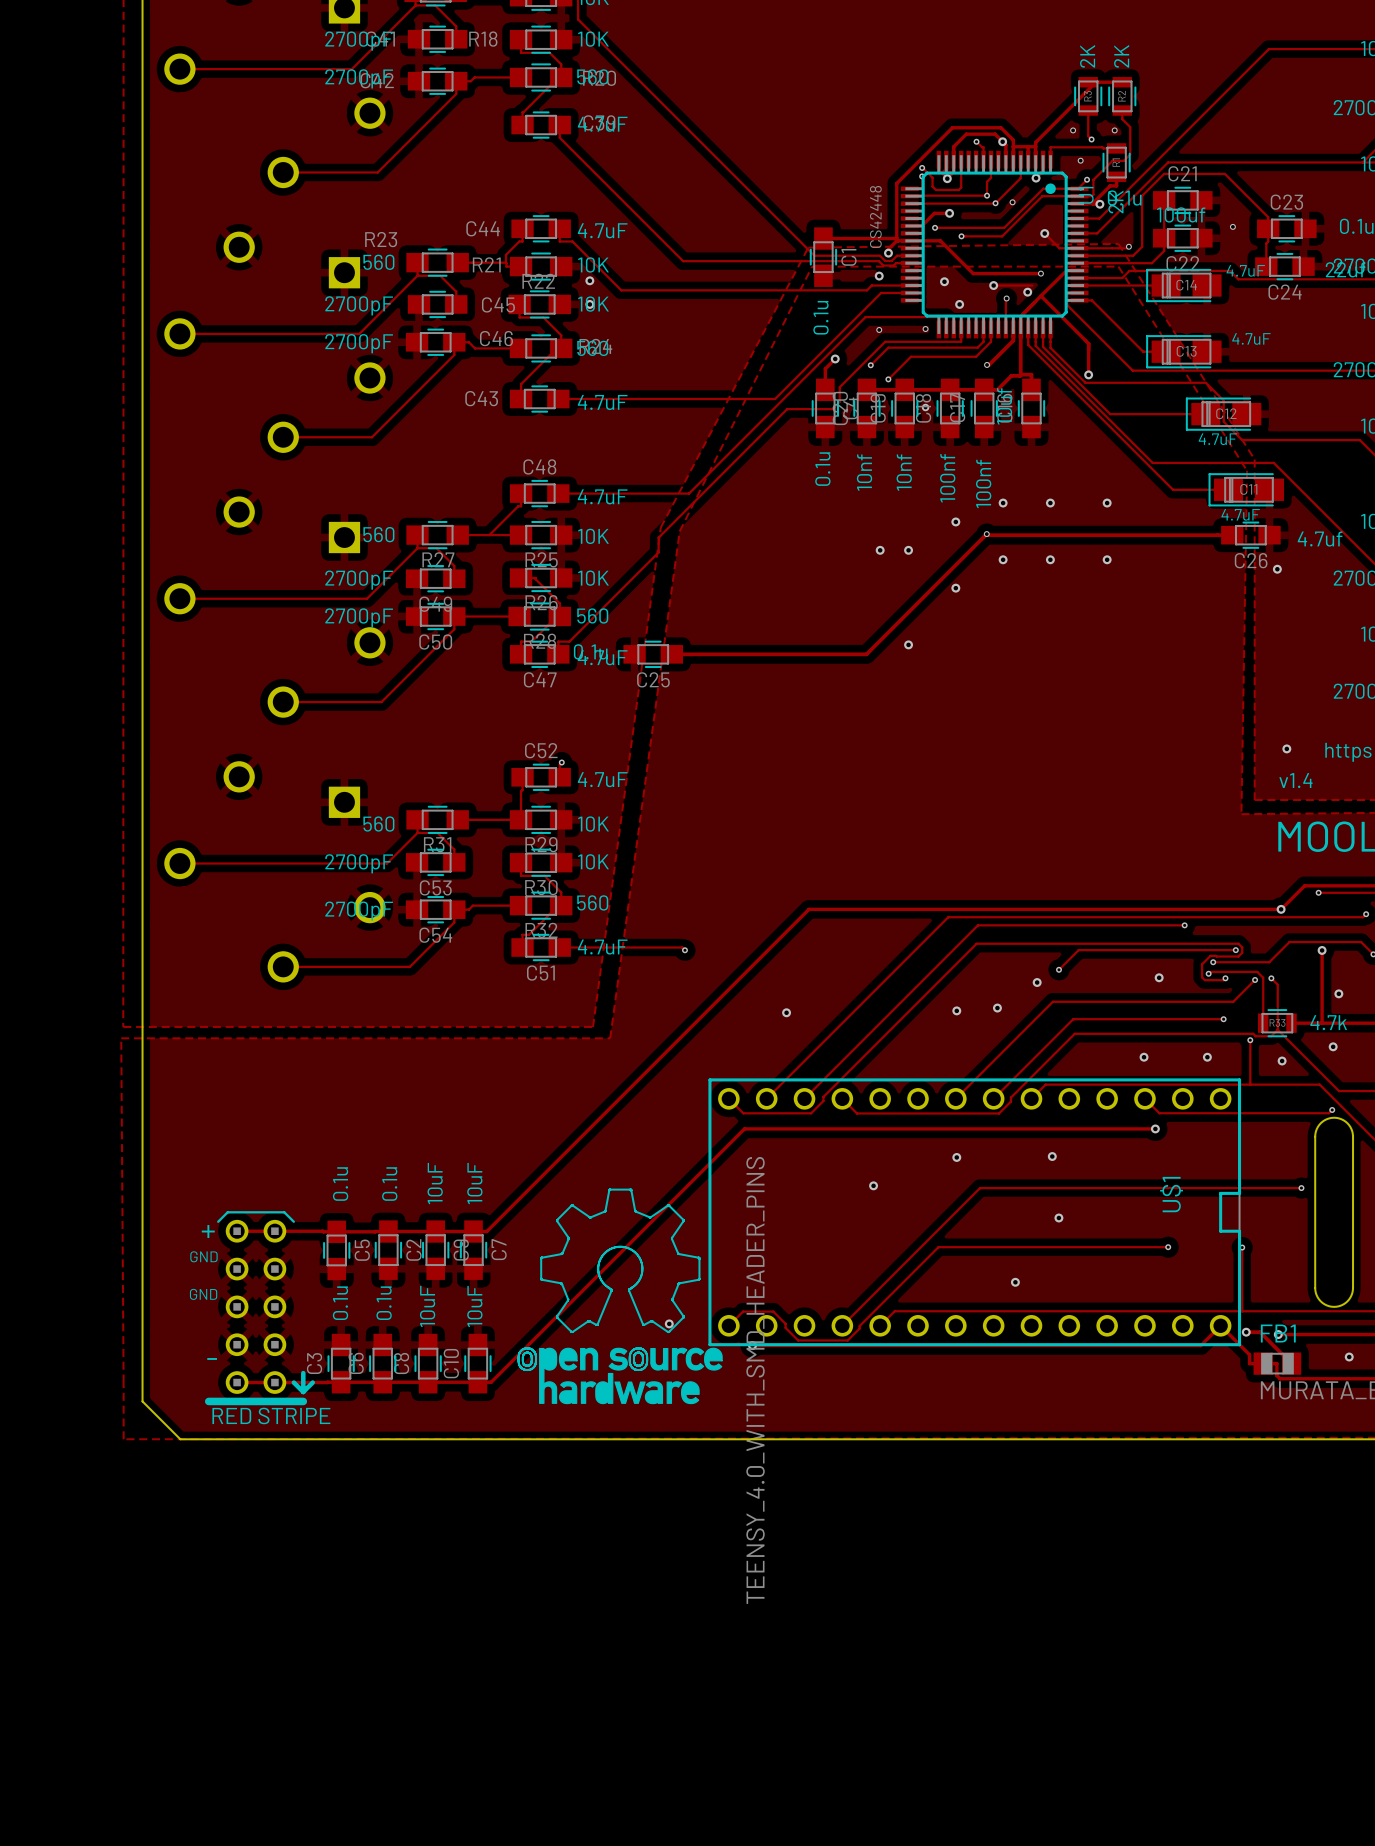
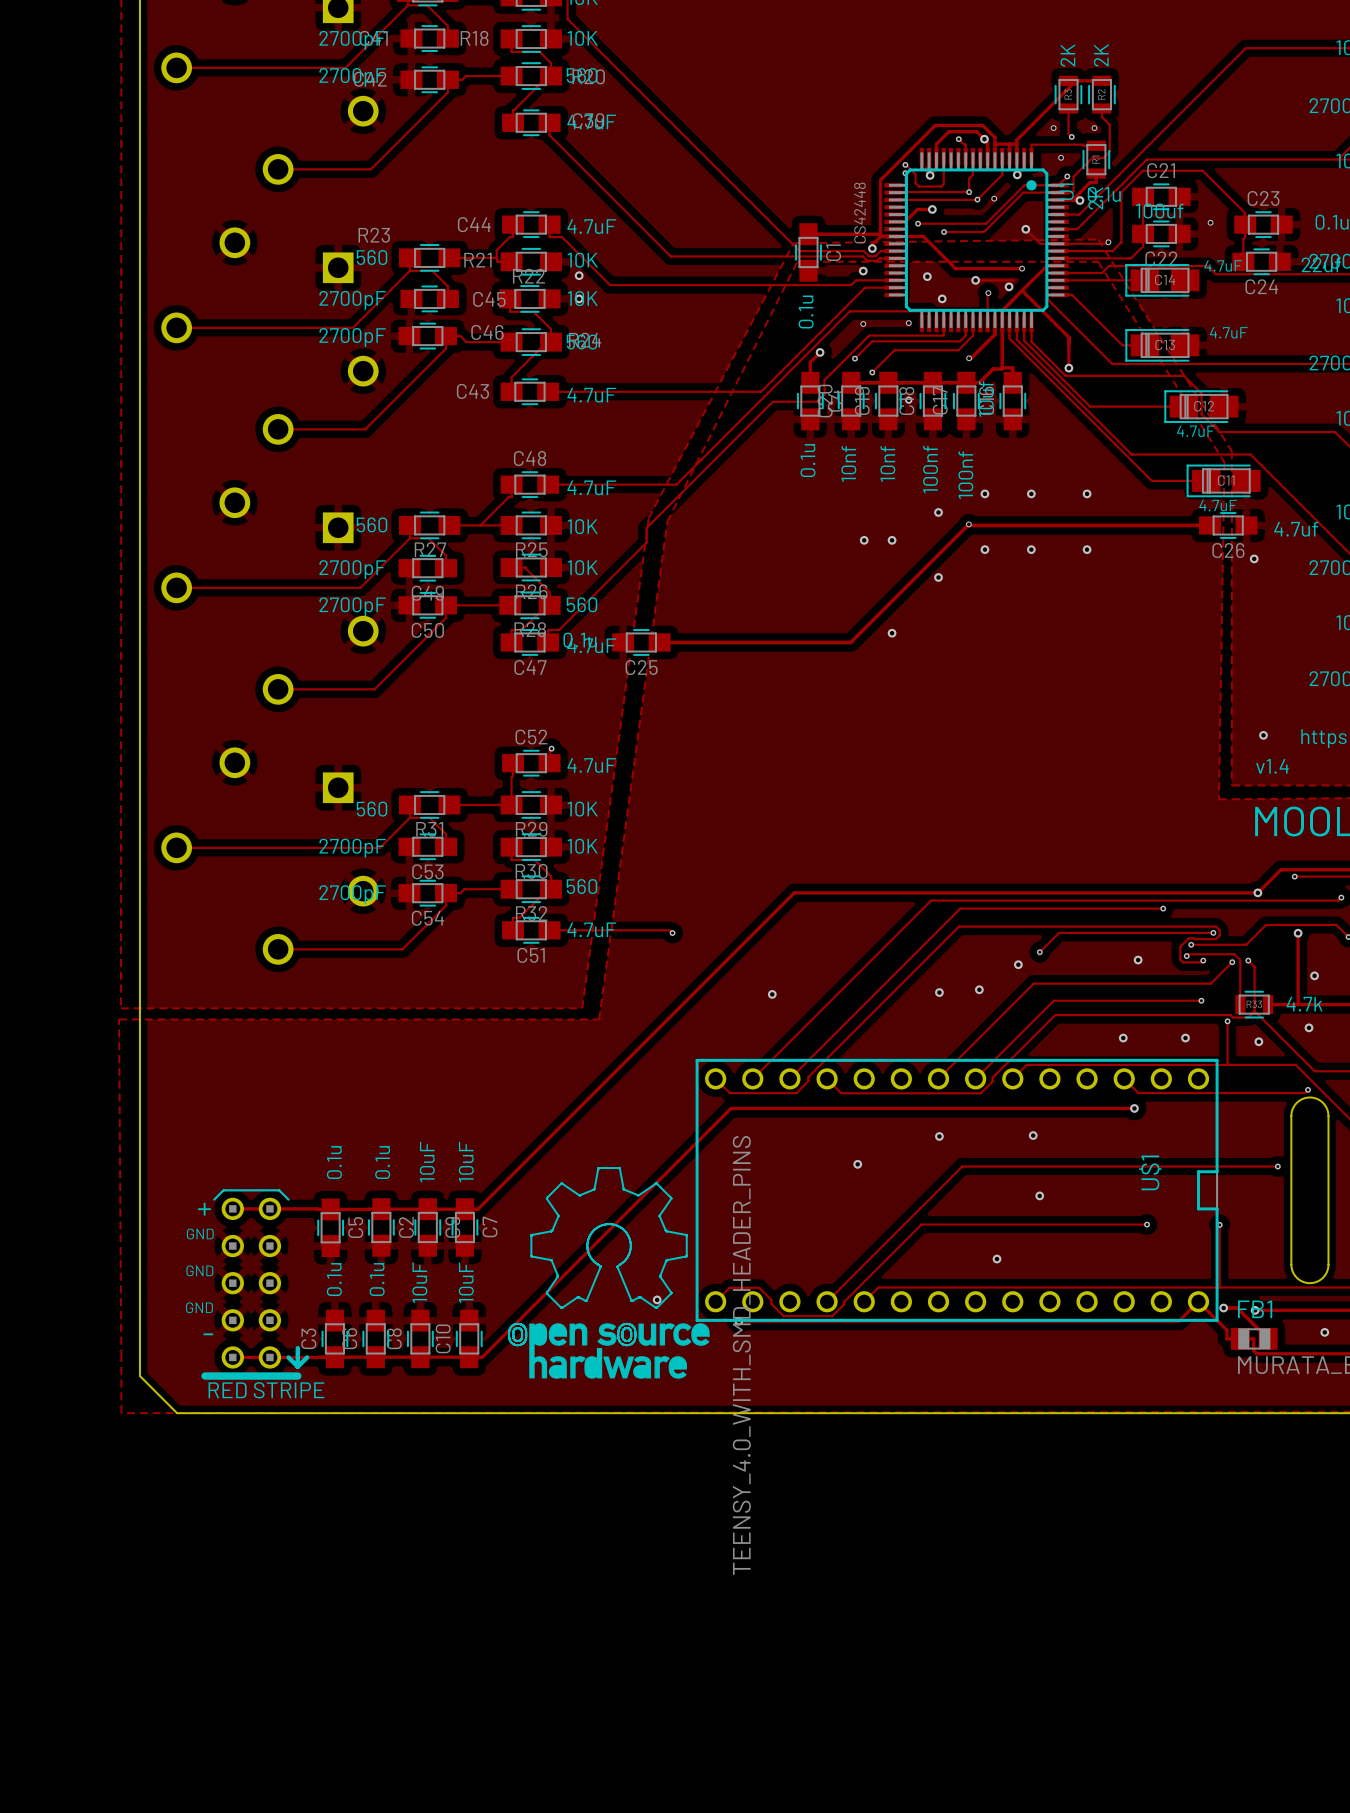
part text: none -> GND (199, 1307)

